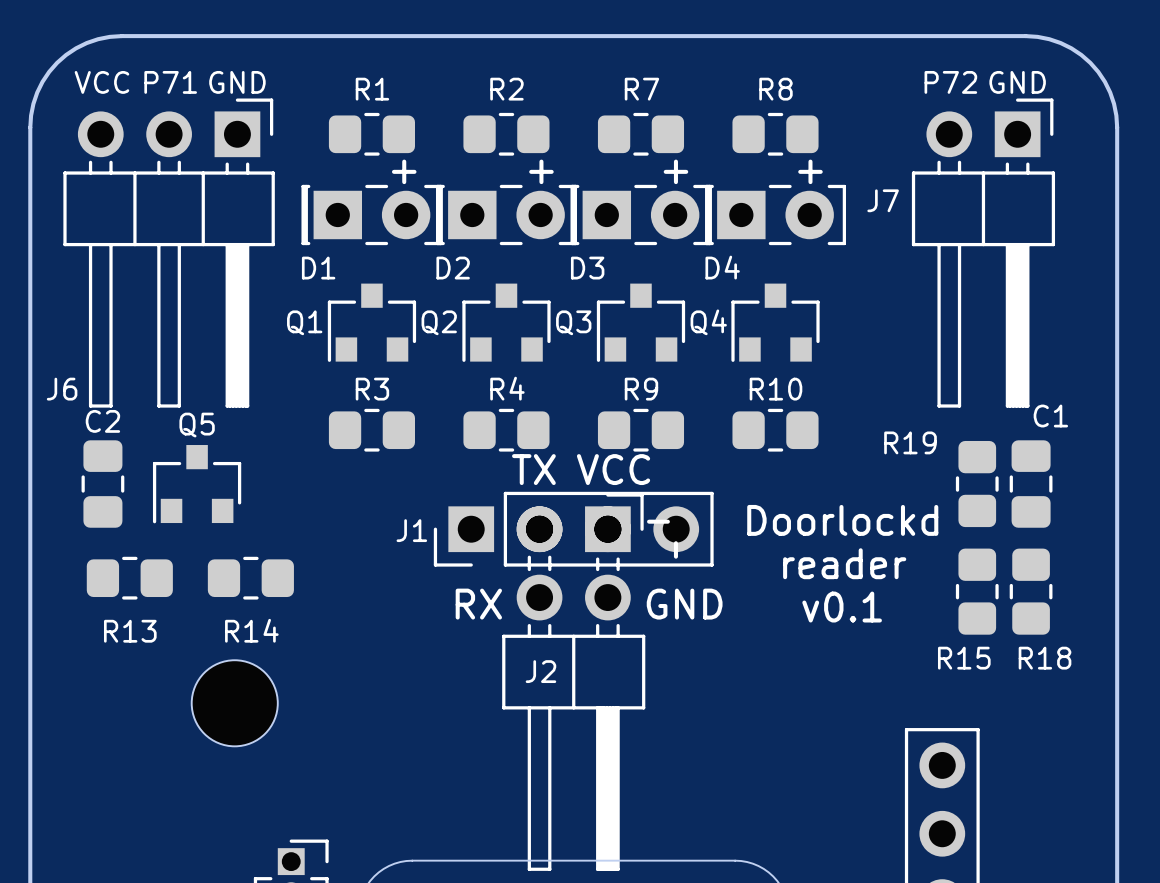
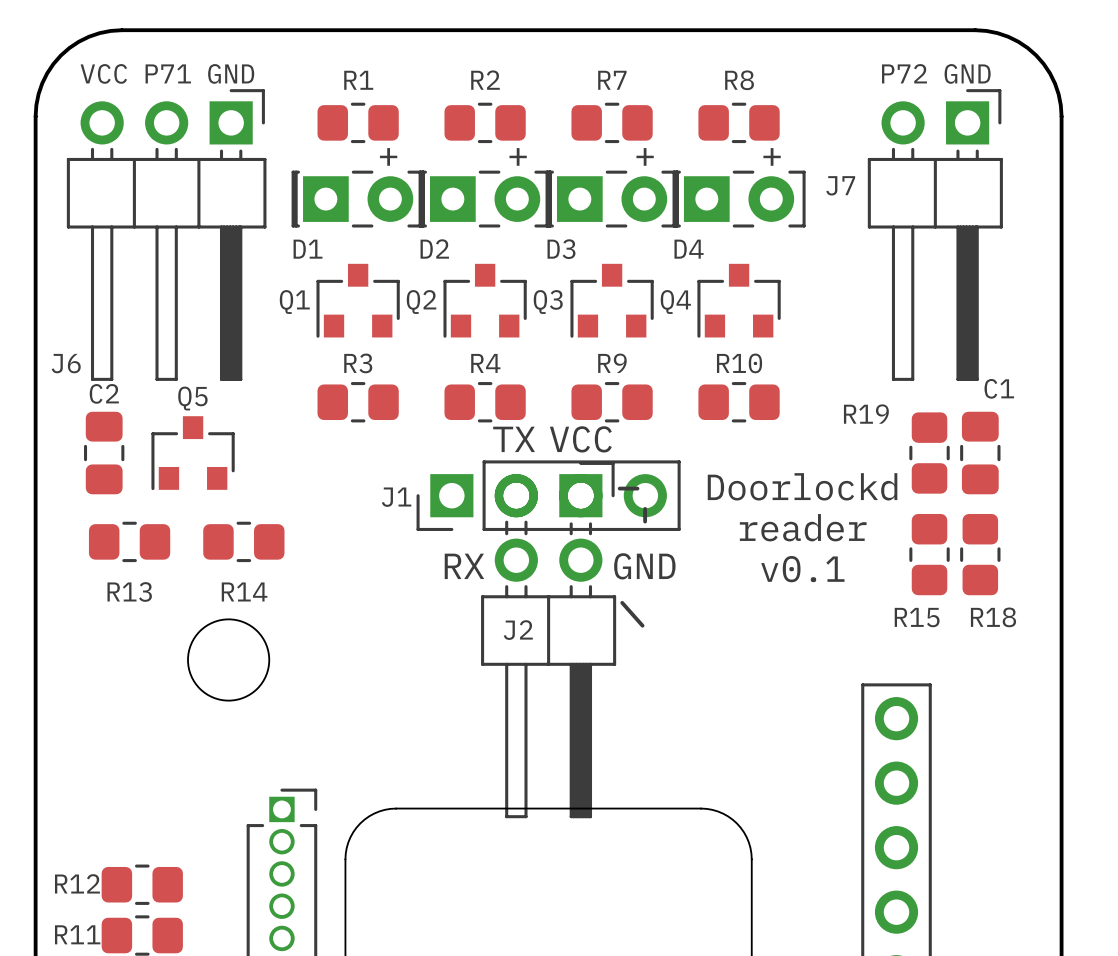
line: none -> (622, 602) (642, 625)

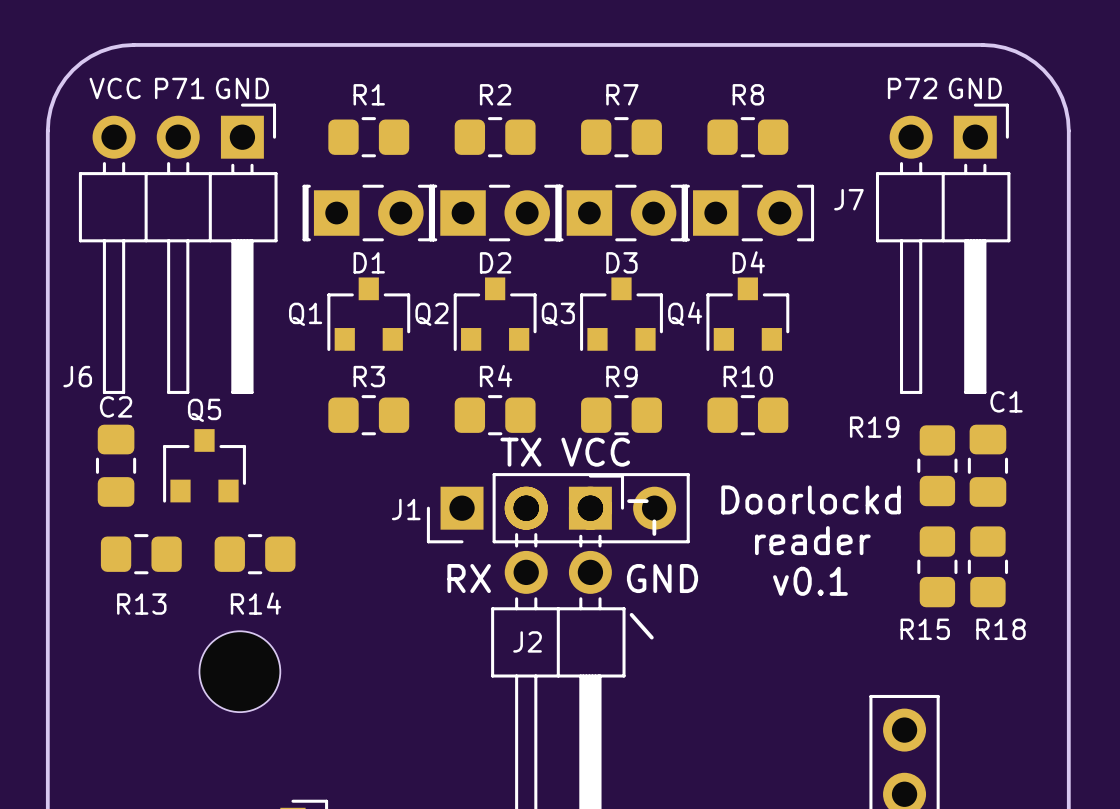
text: + (388, 156) -> none
text: + (518, 156) -> none
text: + (645, 156) -> none
text: + (772, 156) -> none
D2 name position: D2 (434, 248) -> D2 (495, 262)
D1 name position: D1 (308, 249) -> D1 (369, 262)
D3 name position: D3 (561, 249) -> D3 (621, 262)
D4 name position: D4 (689, 249) -> D4 (748, 262)

